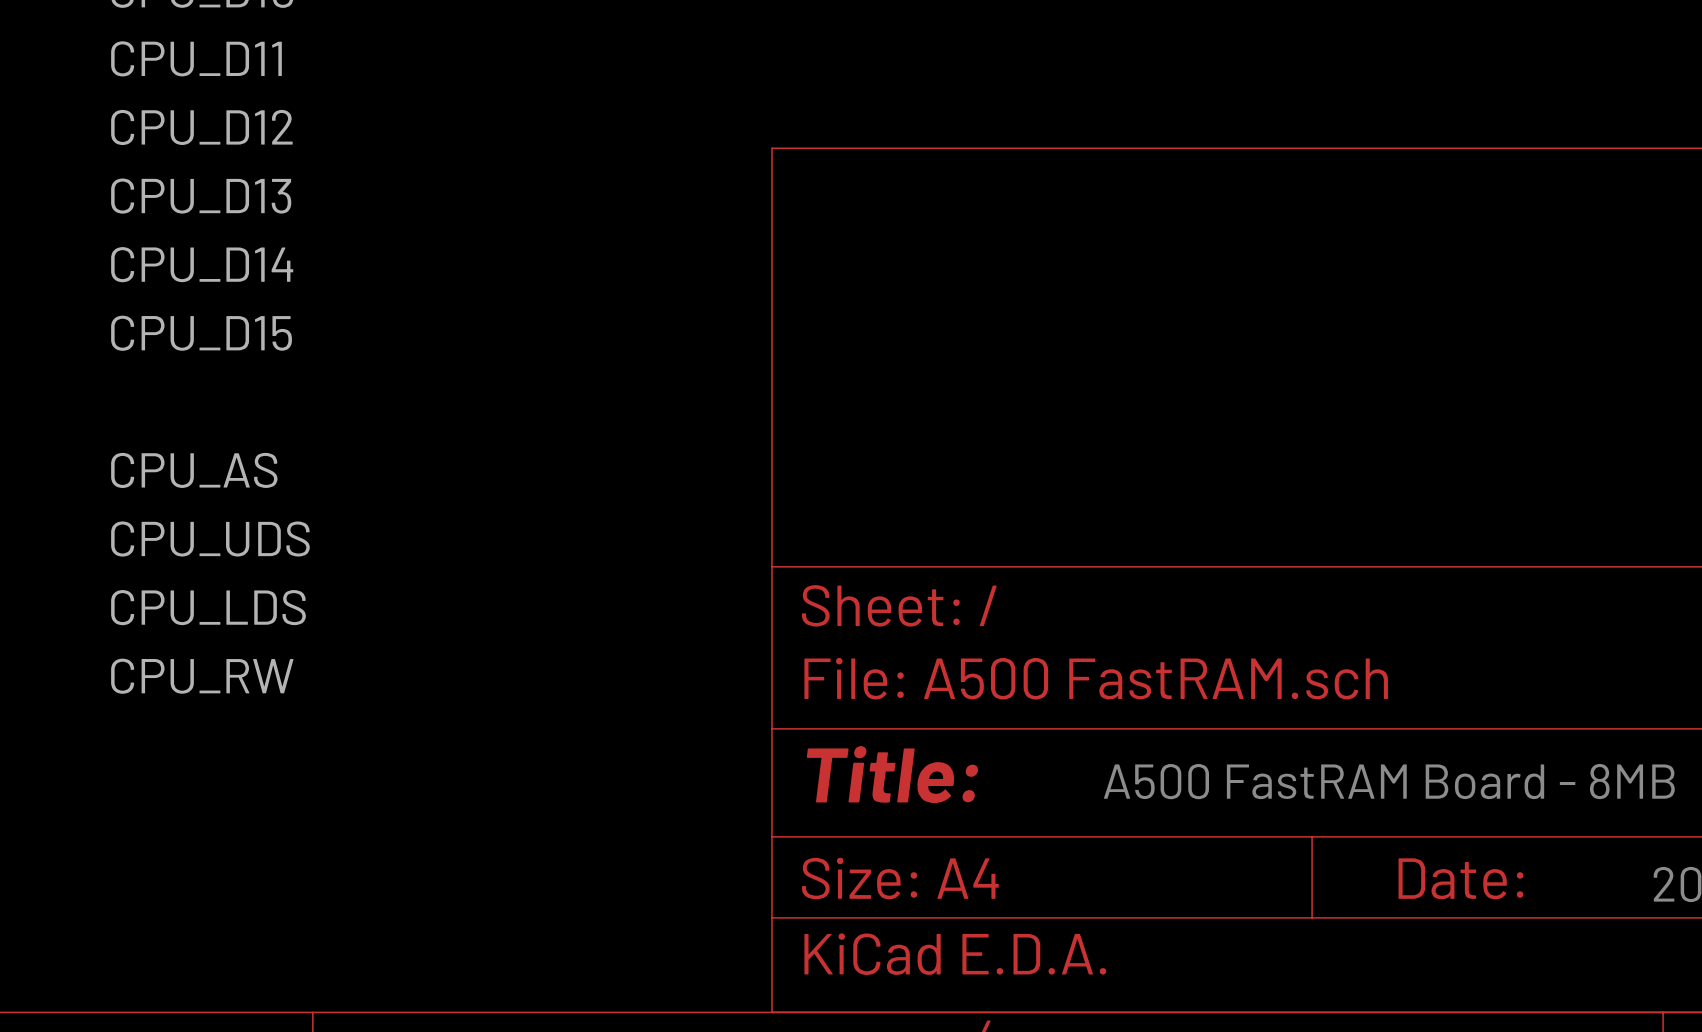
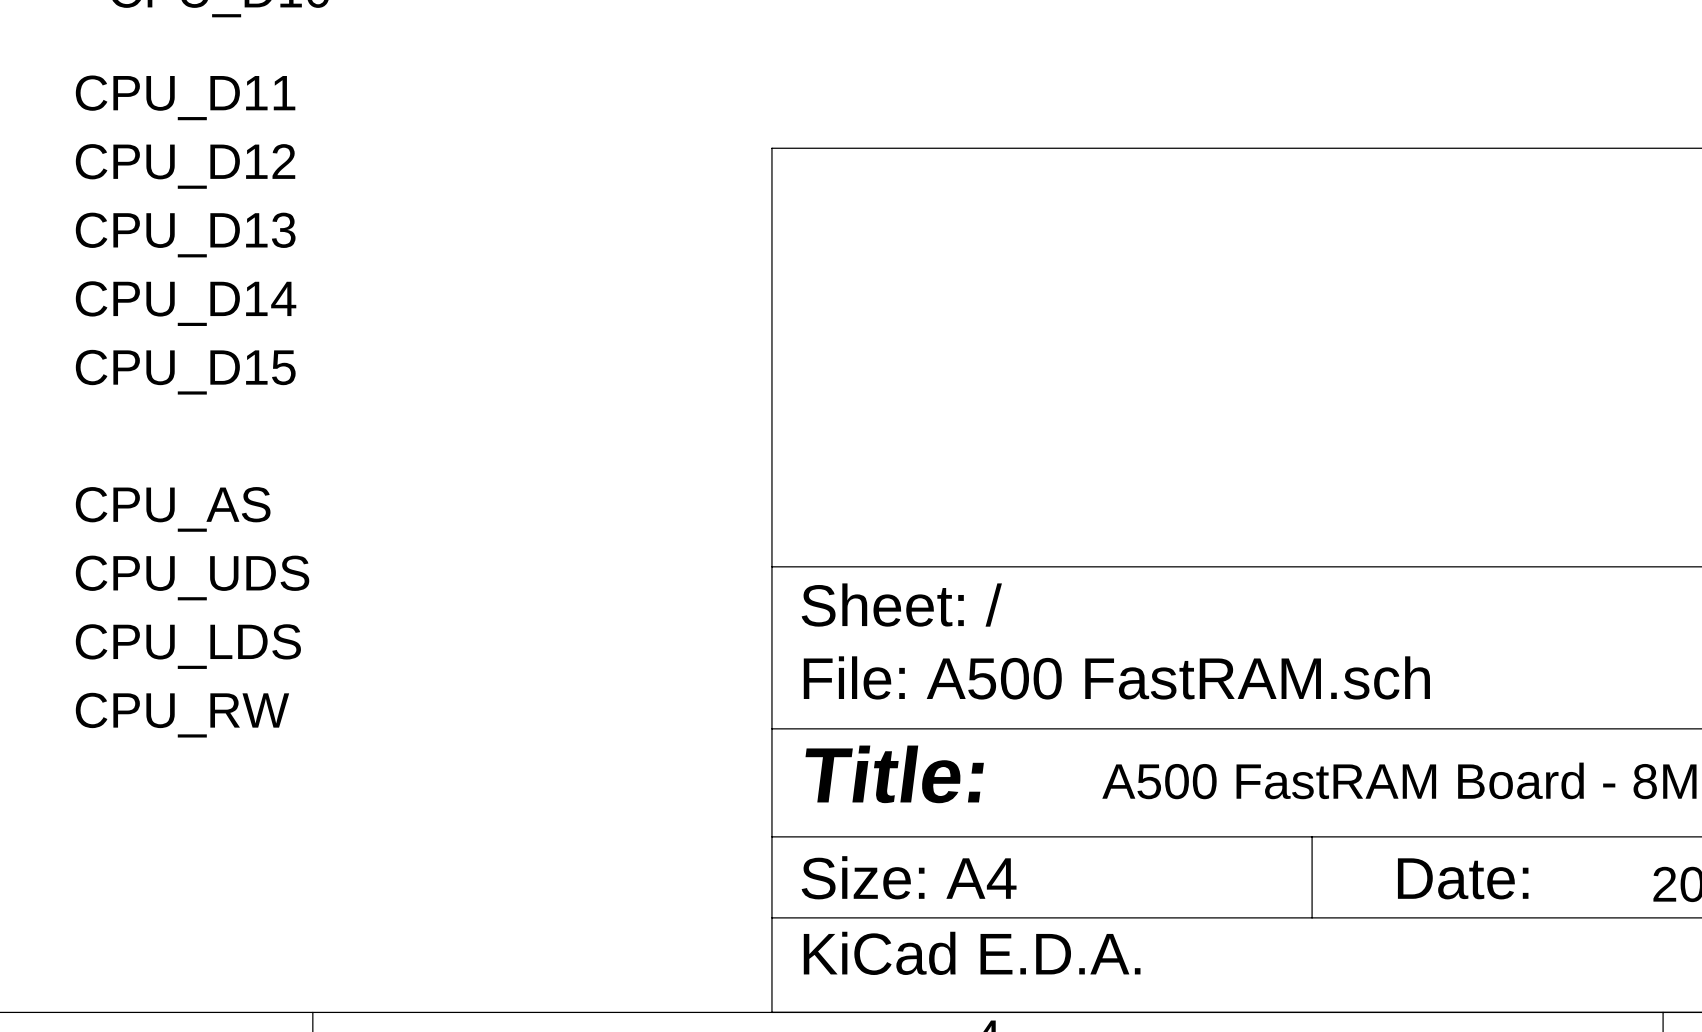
label position: CPU_D11 (196, 58) -> CPU_D11 (185, 97)
label position: CPU_D12 (201, 127) -> CPU_D12 (185, 166)
label position: CPU_D13 (201, 196) -> CPU_D13 (185, 235)
label position: CPU_D14 (202, 264) -> CPU_D14 (186, 303)
label position: CPU_D15 (201, 333) -> CPU_D15 (185, 372)
label position: CPU_AS (194, 470) -> CPU_AS (173, 509)
label position: CPU_UDS (210, 539) -> CPU_UDS (192, 577)
label position: CPU_LDS (208, 607) -> CPU_LDS (188, 646)
label position: CPU_RW (202, 676) -> CPU_RW (182, 715)

